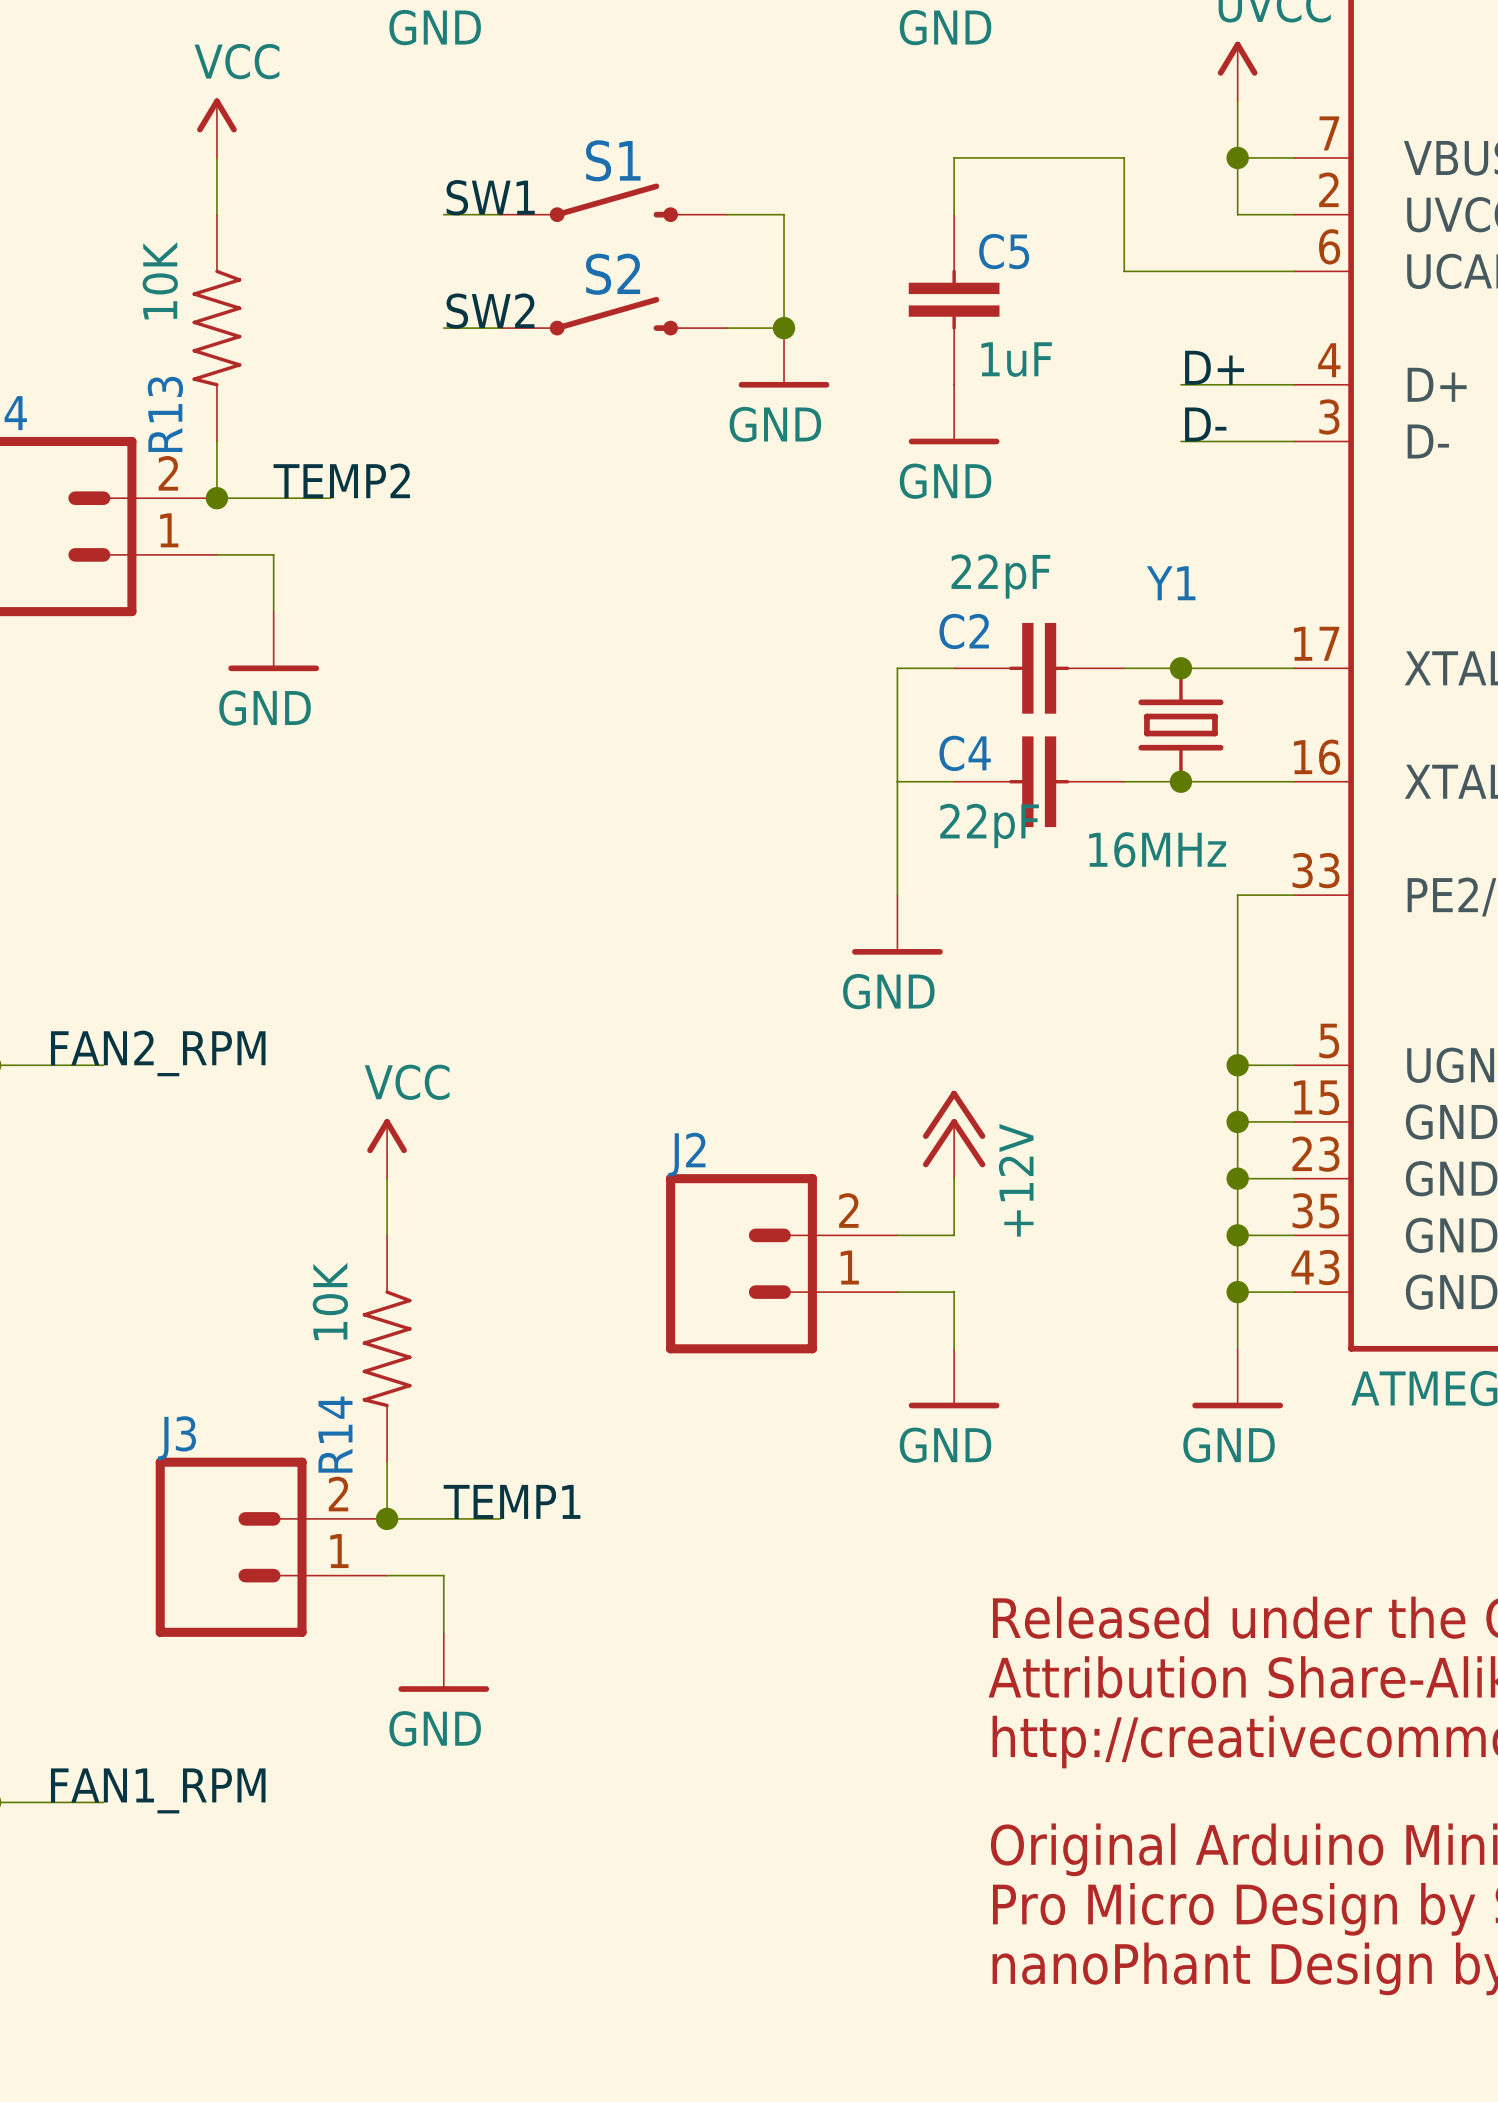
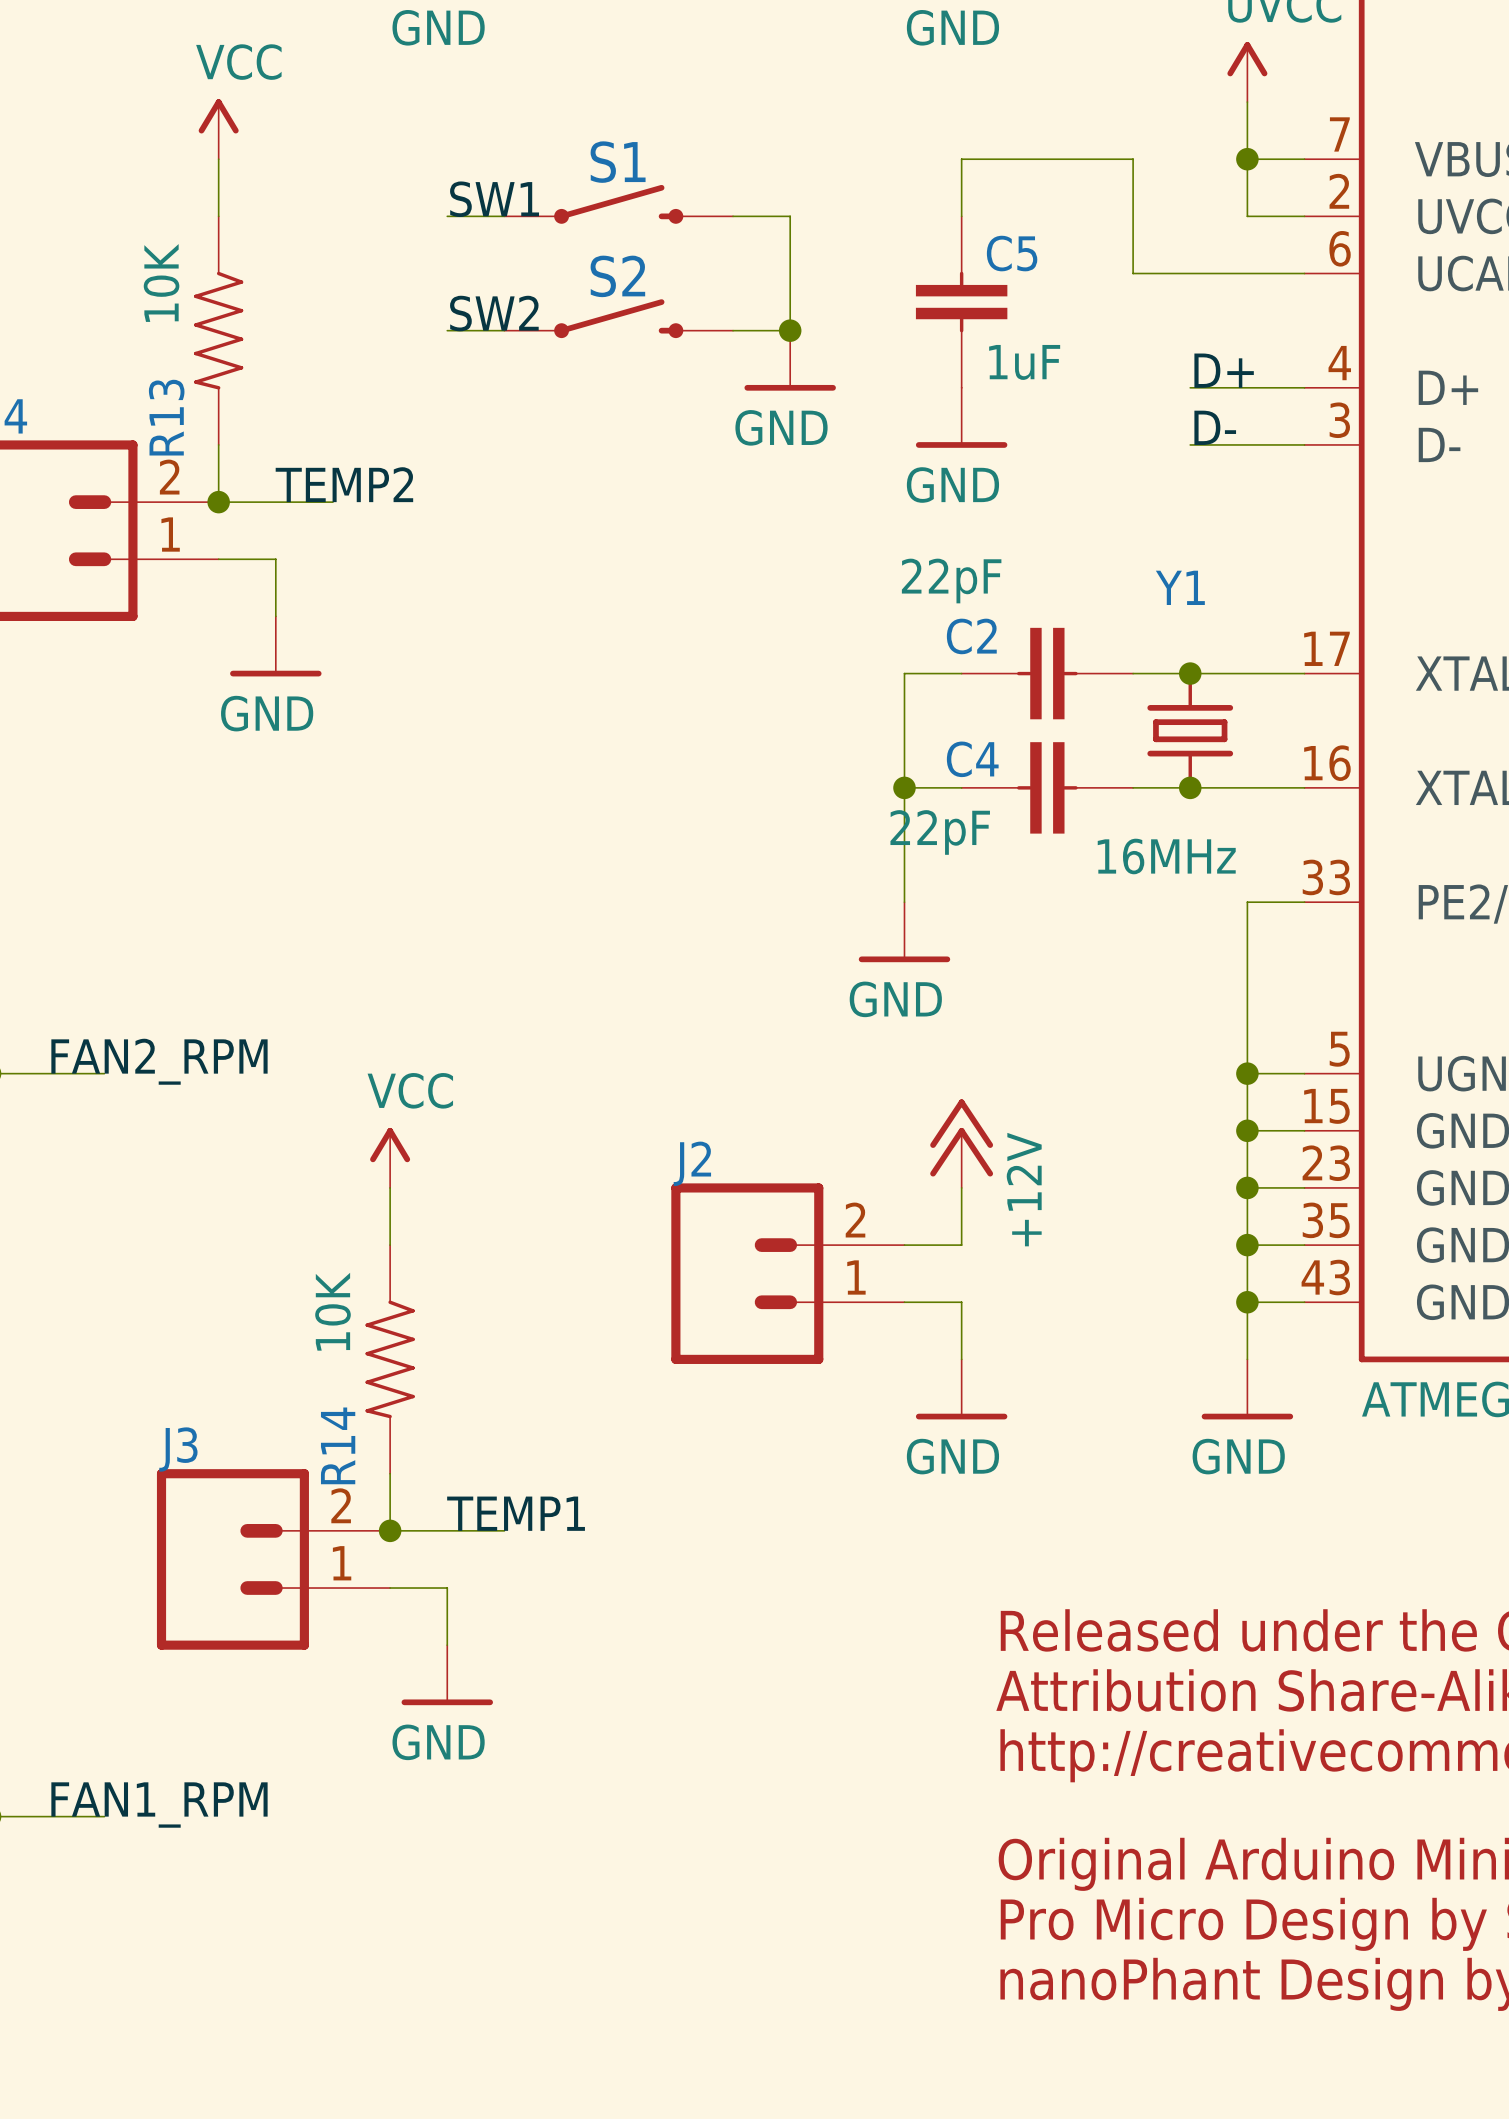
C2 value position: 22pF (1000, 576) -> 22pF (951, 581)
junction: none -> (904, 787)
C4 value position: 22pF (989, 825) -> 22pF (940, 832)

